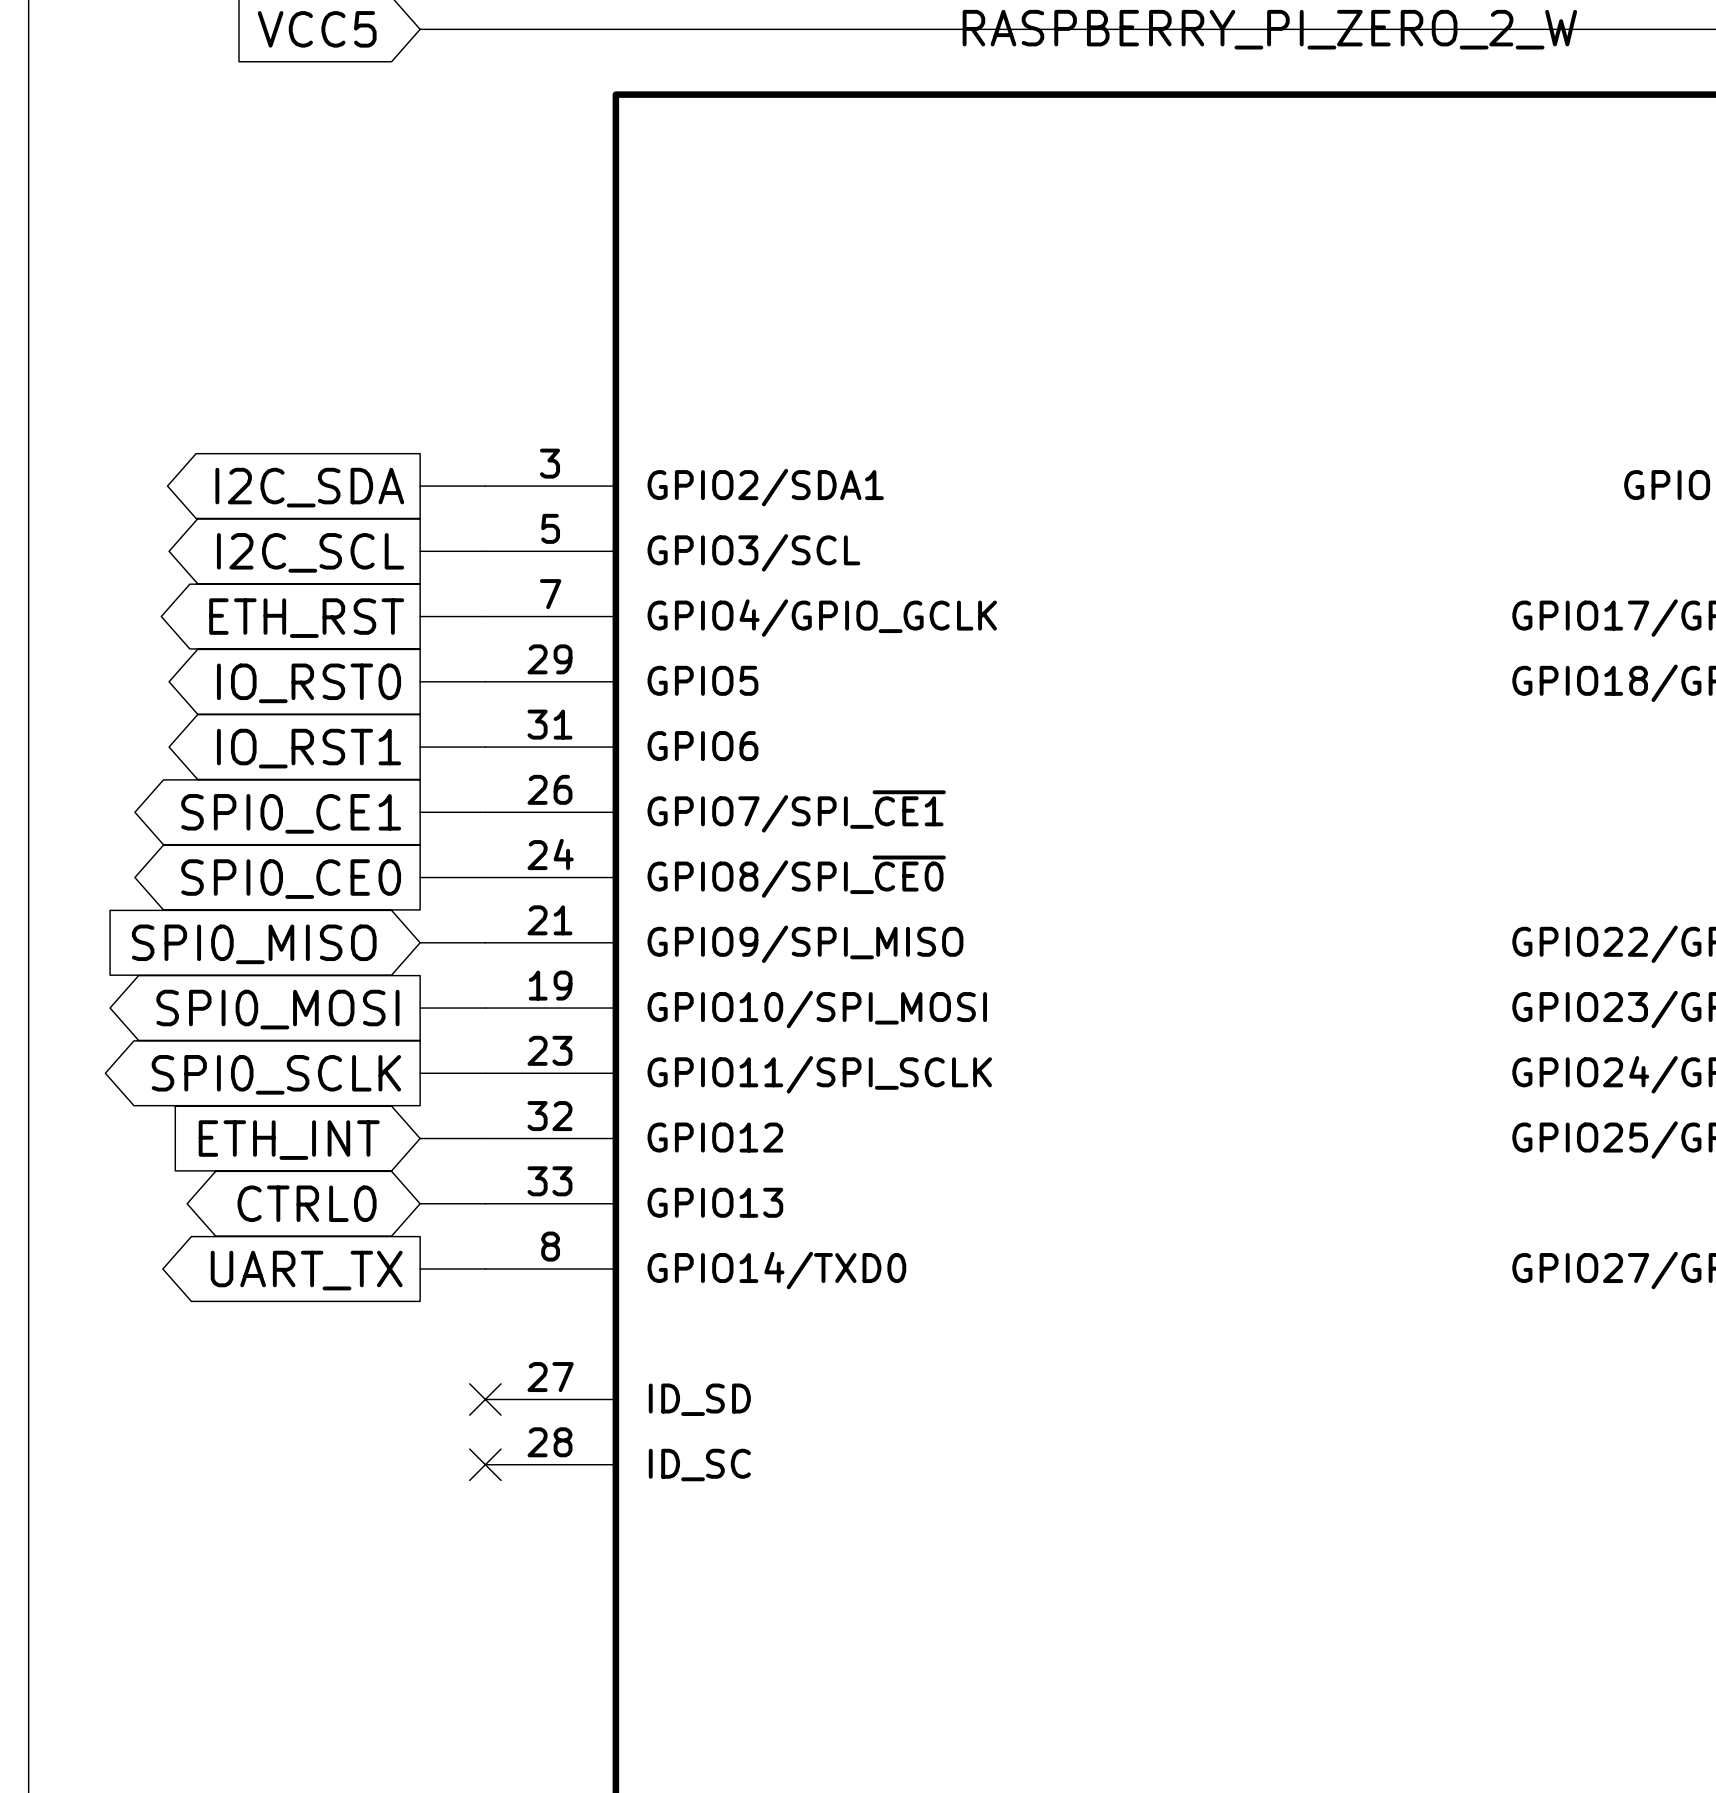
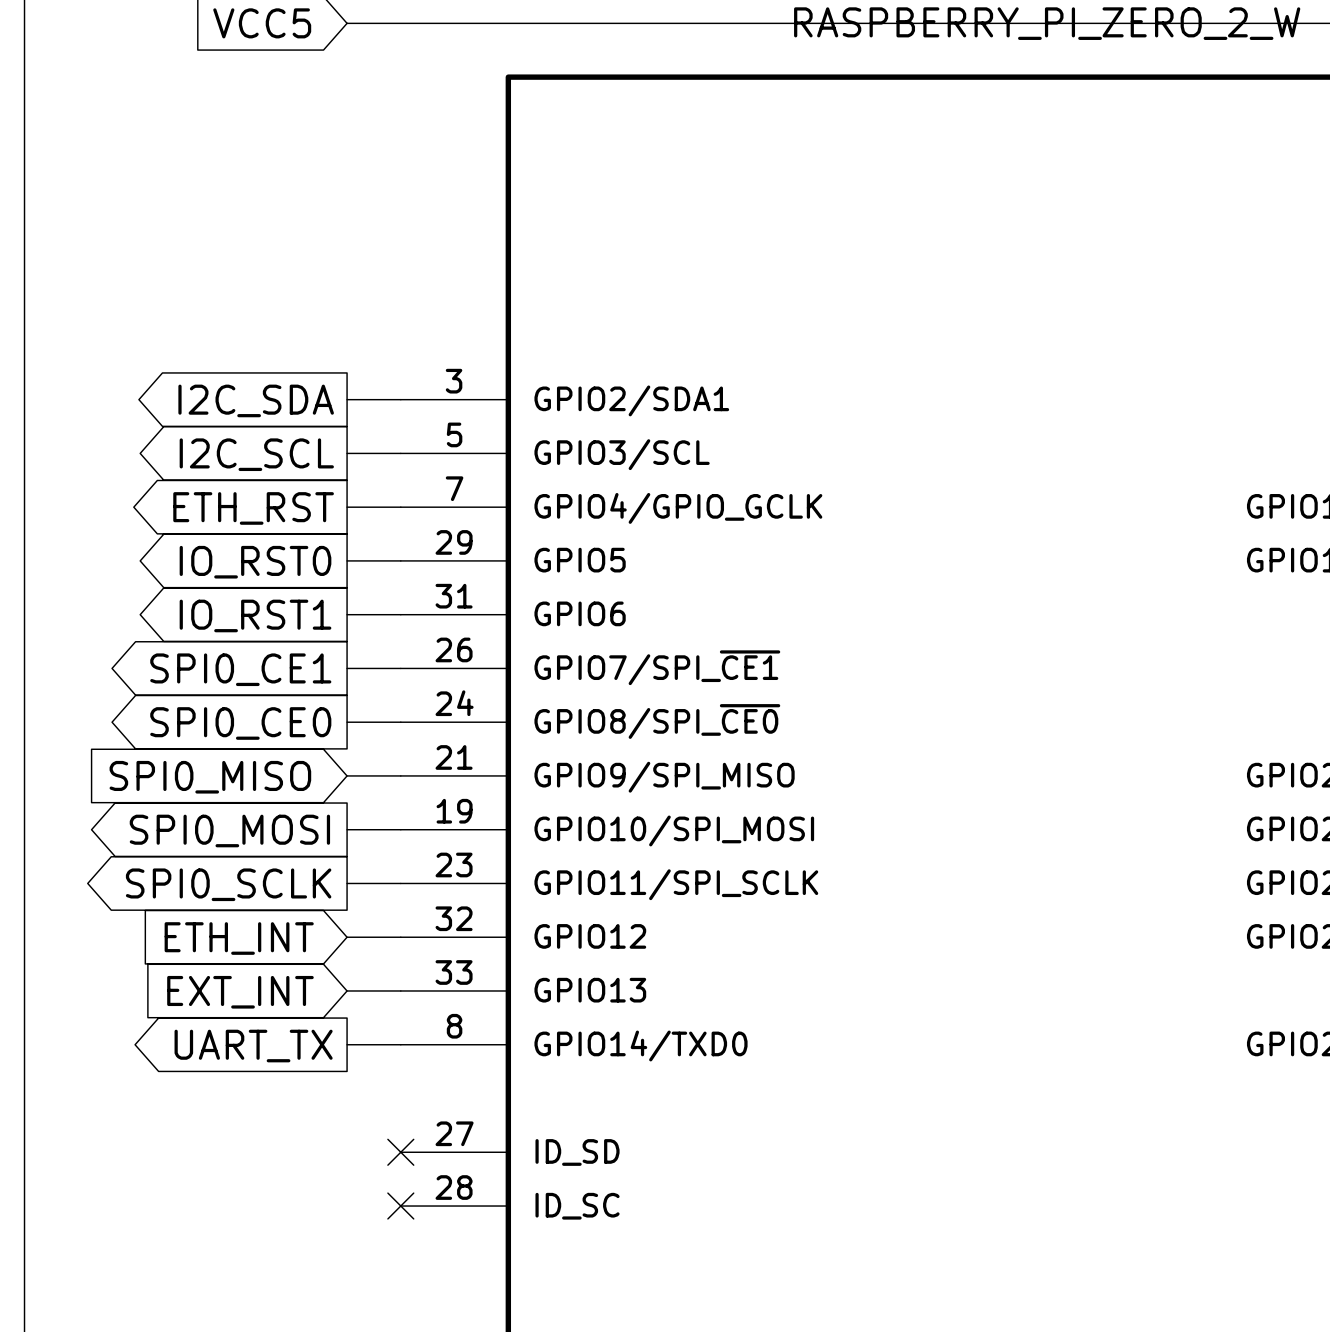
global label shape: bidirectional (307, 1203) -> input (240, 992)
global label: CTRL0 (307, 1203) -> EXT_INT (240, 992)

